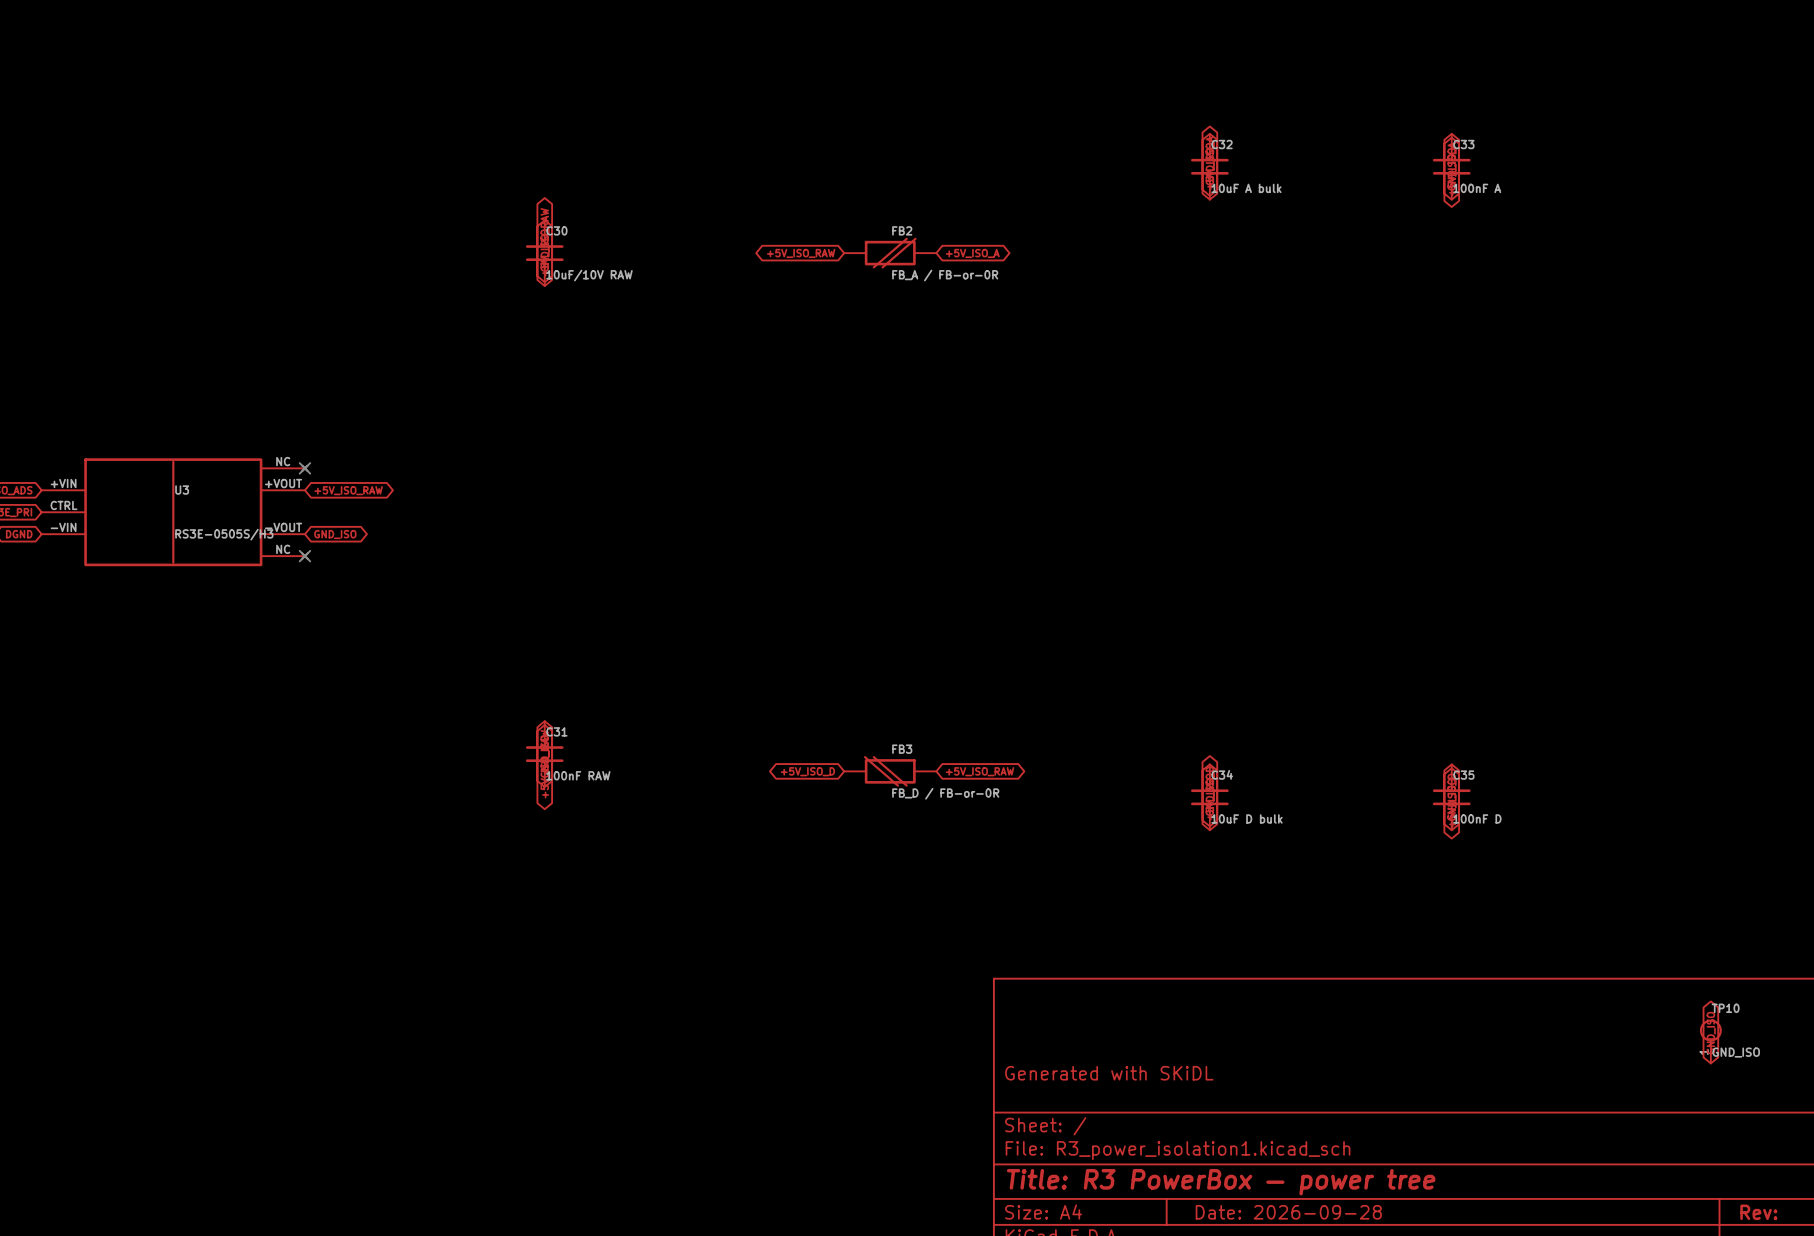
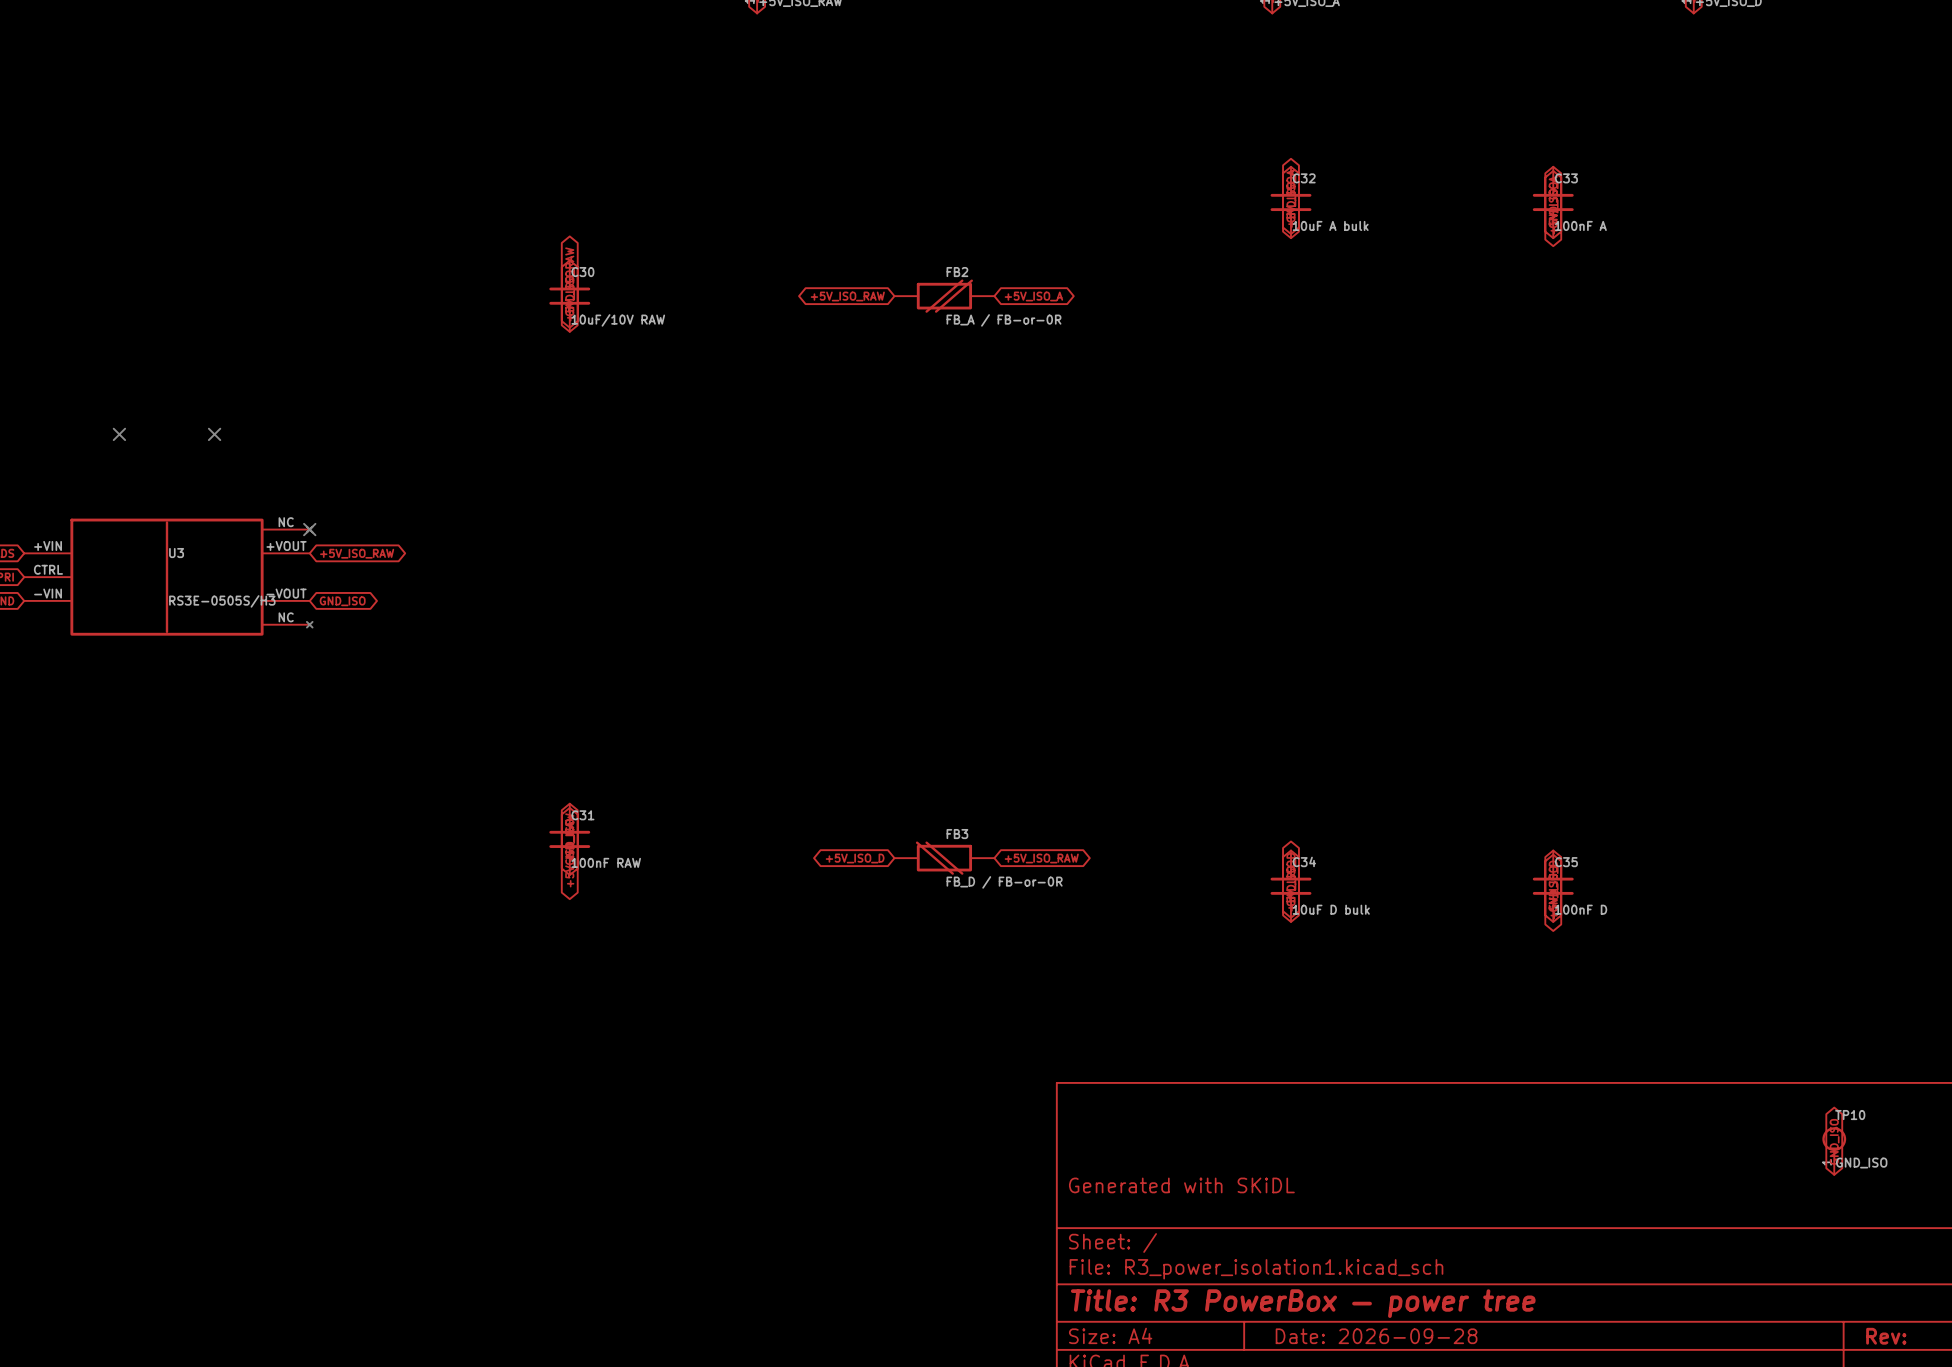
no-connect mark: none -> (119, 434)
no-connect mark: none -> (214, 434)
no-connect mark: (304, 556) -> none

